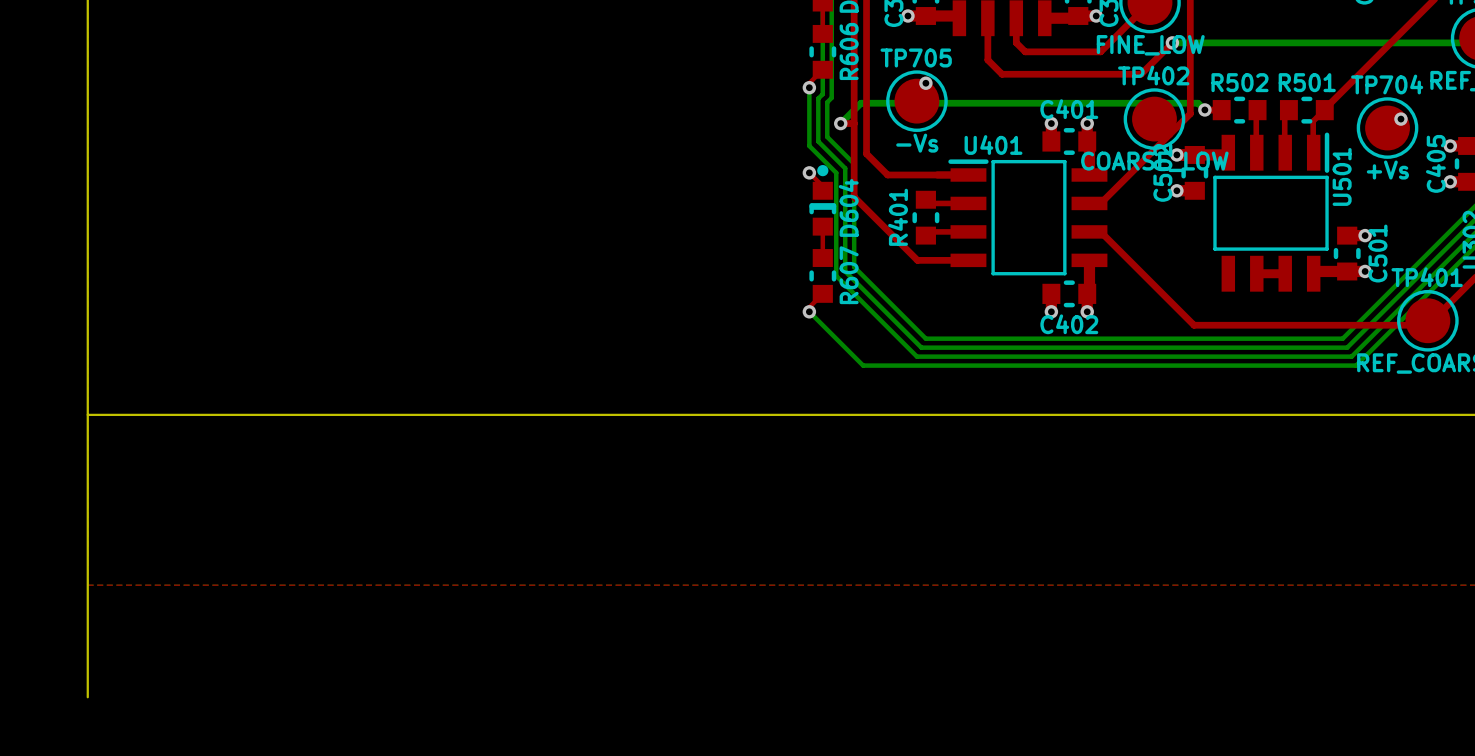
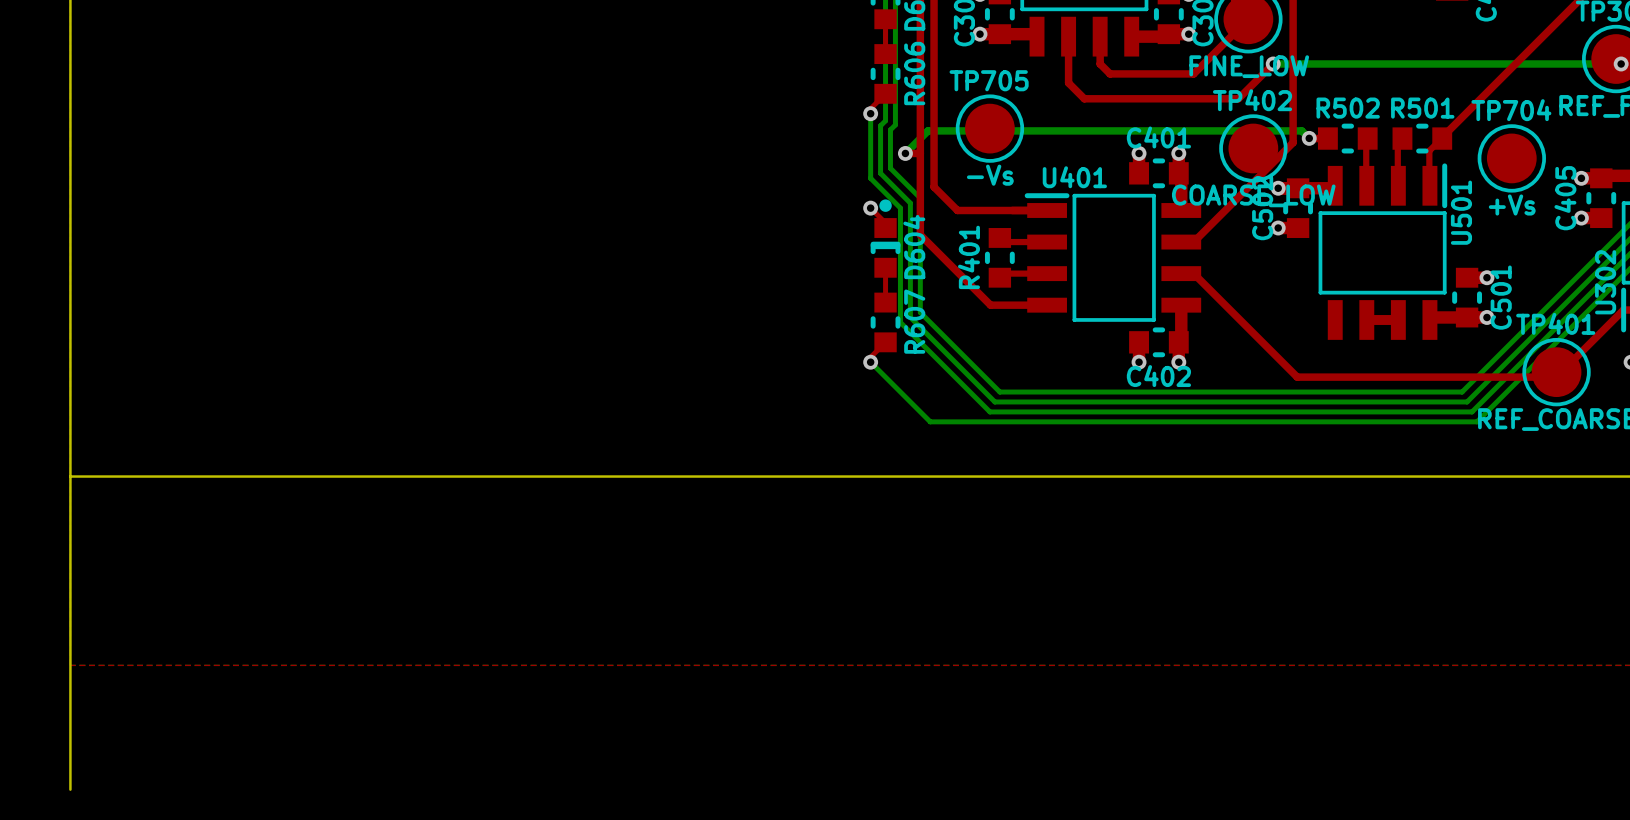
via: (925, 83) -> none
via: (1400, 119) -> none

